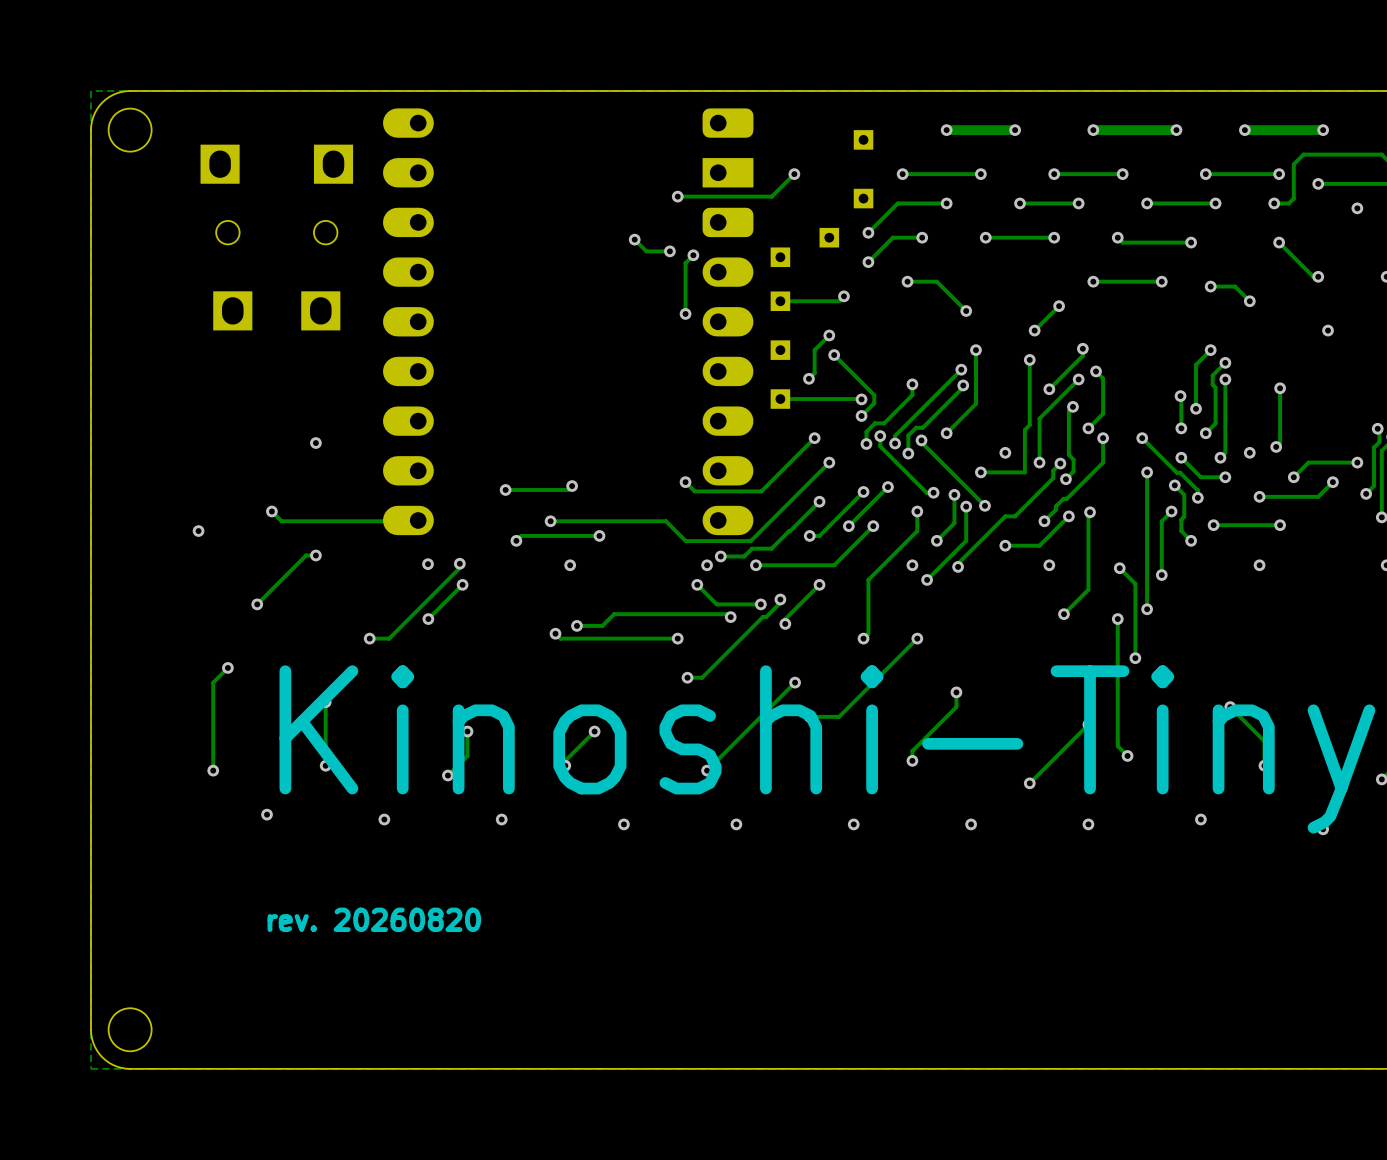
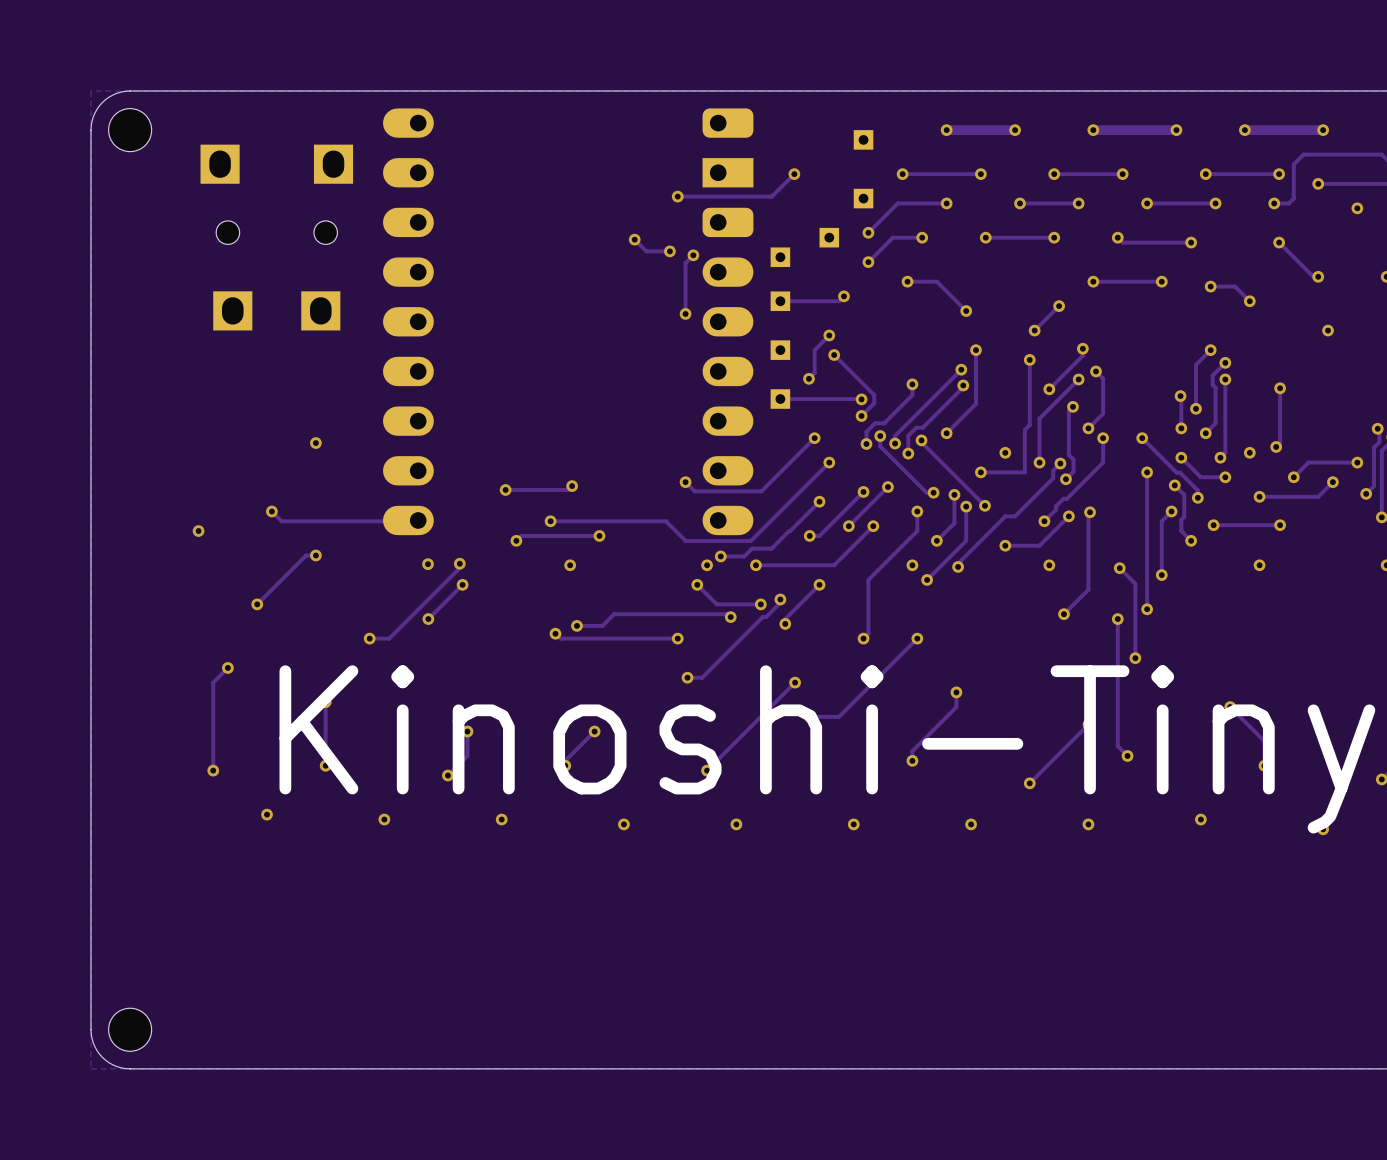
text: rev. 20260820 (374, 919) -> none

